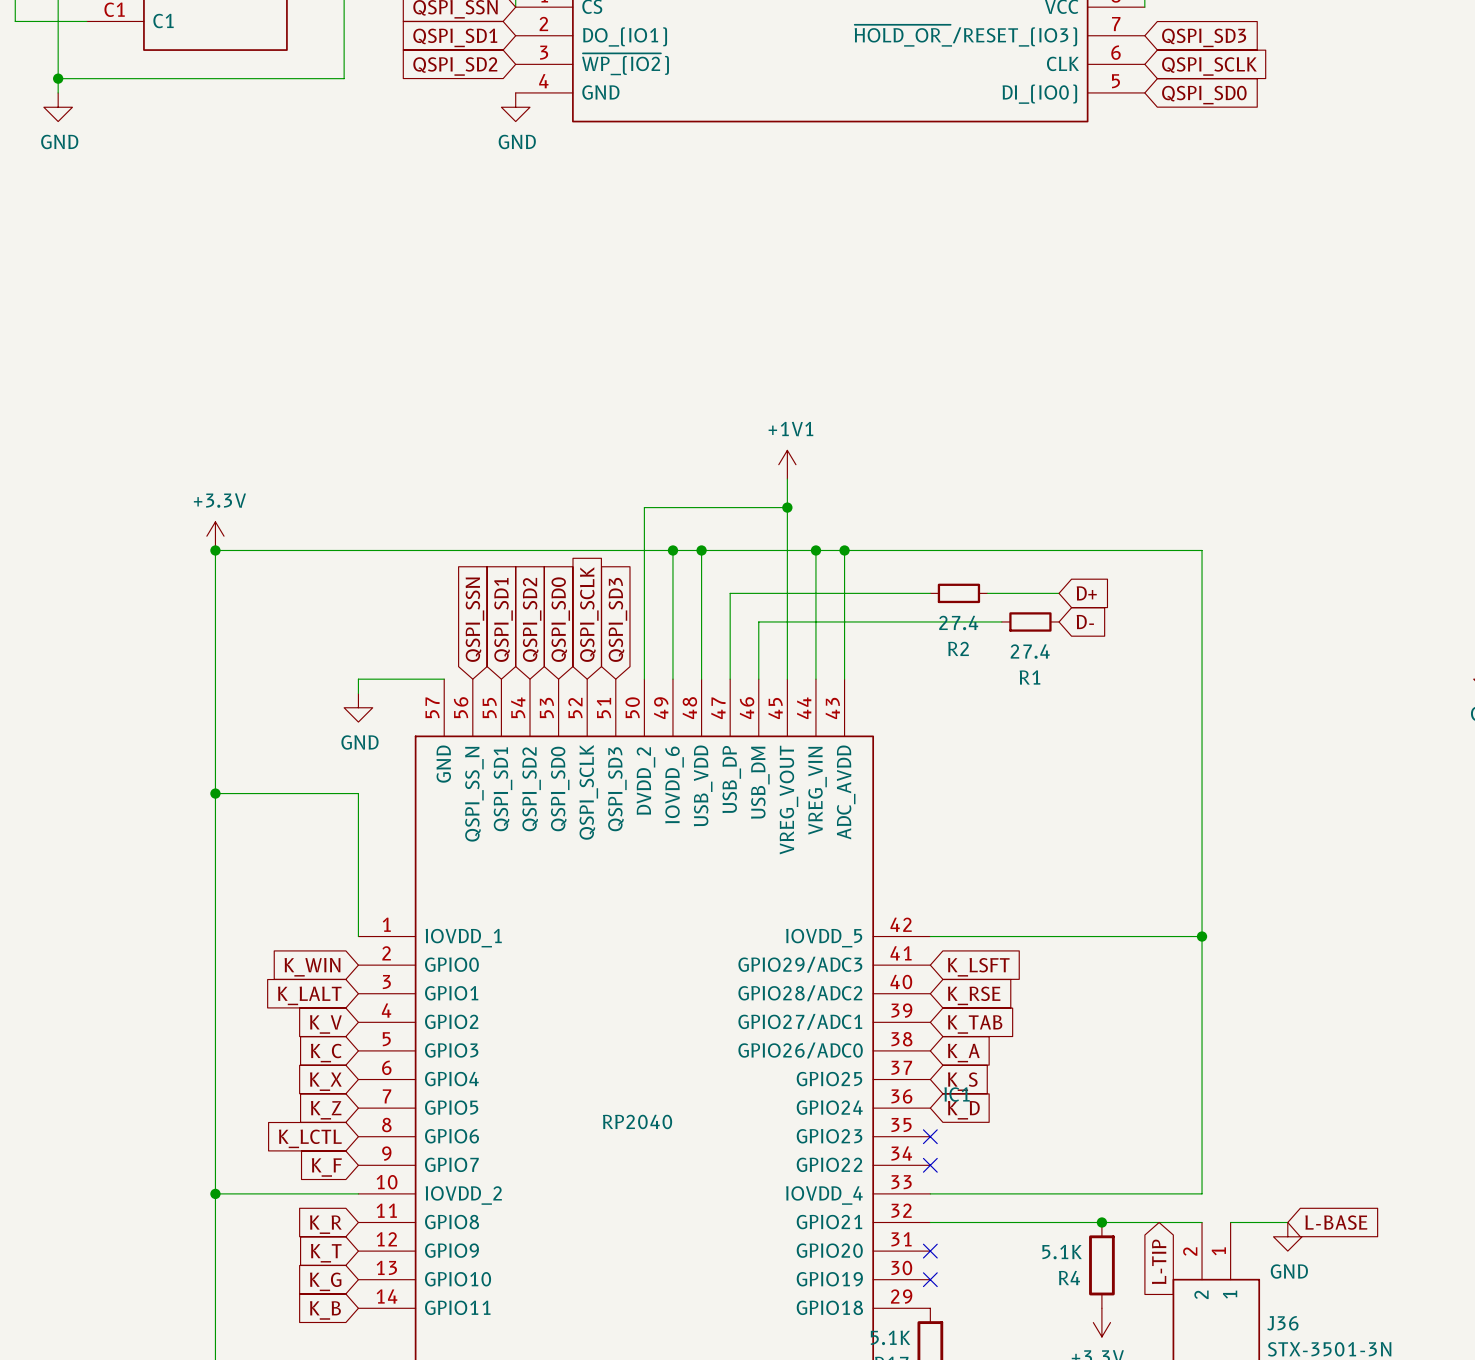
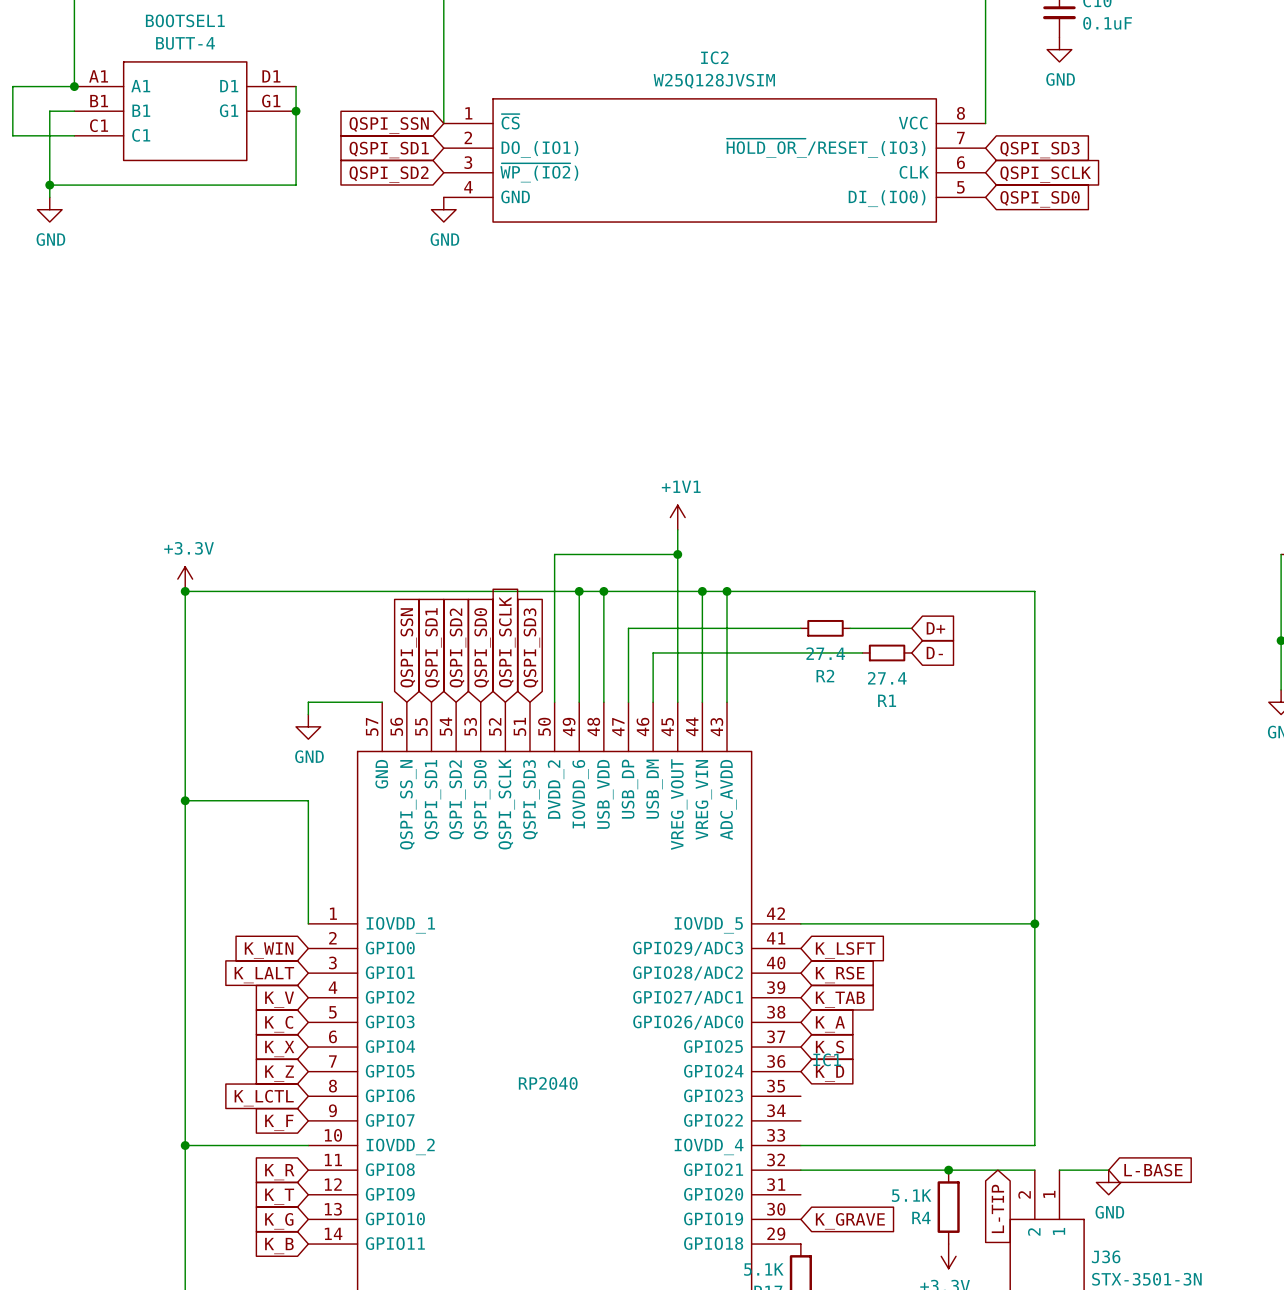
no-connect mark: (930, 1136) -> none
no-connect mark: (930, 1165) -> none
no-connect mark: (930, 1251) -> none
no-connect mark: (930, 1279) -> none
global label: none -> K_GRAVE (850, 1221)

